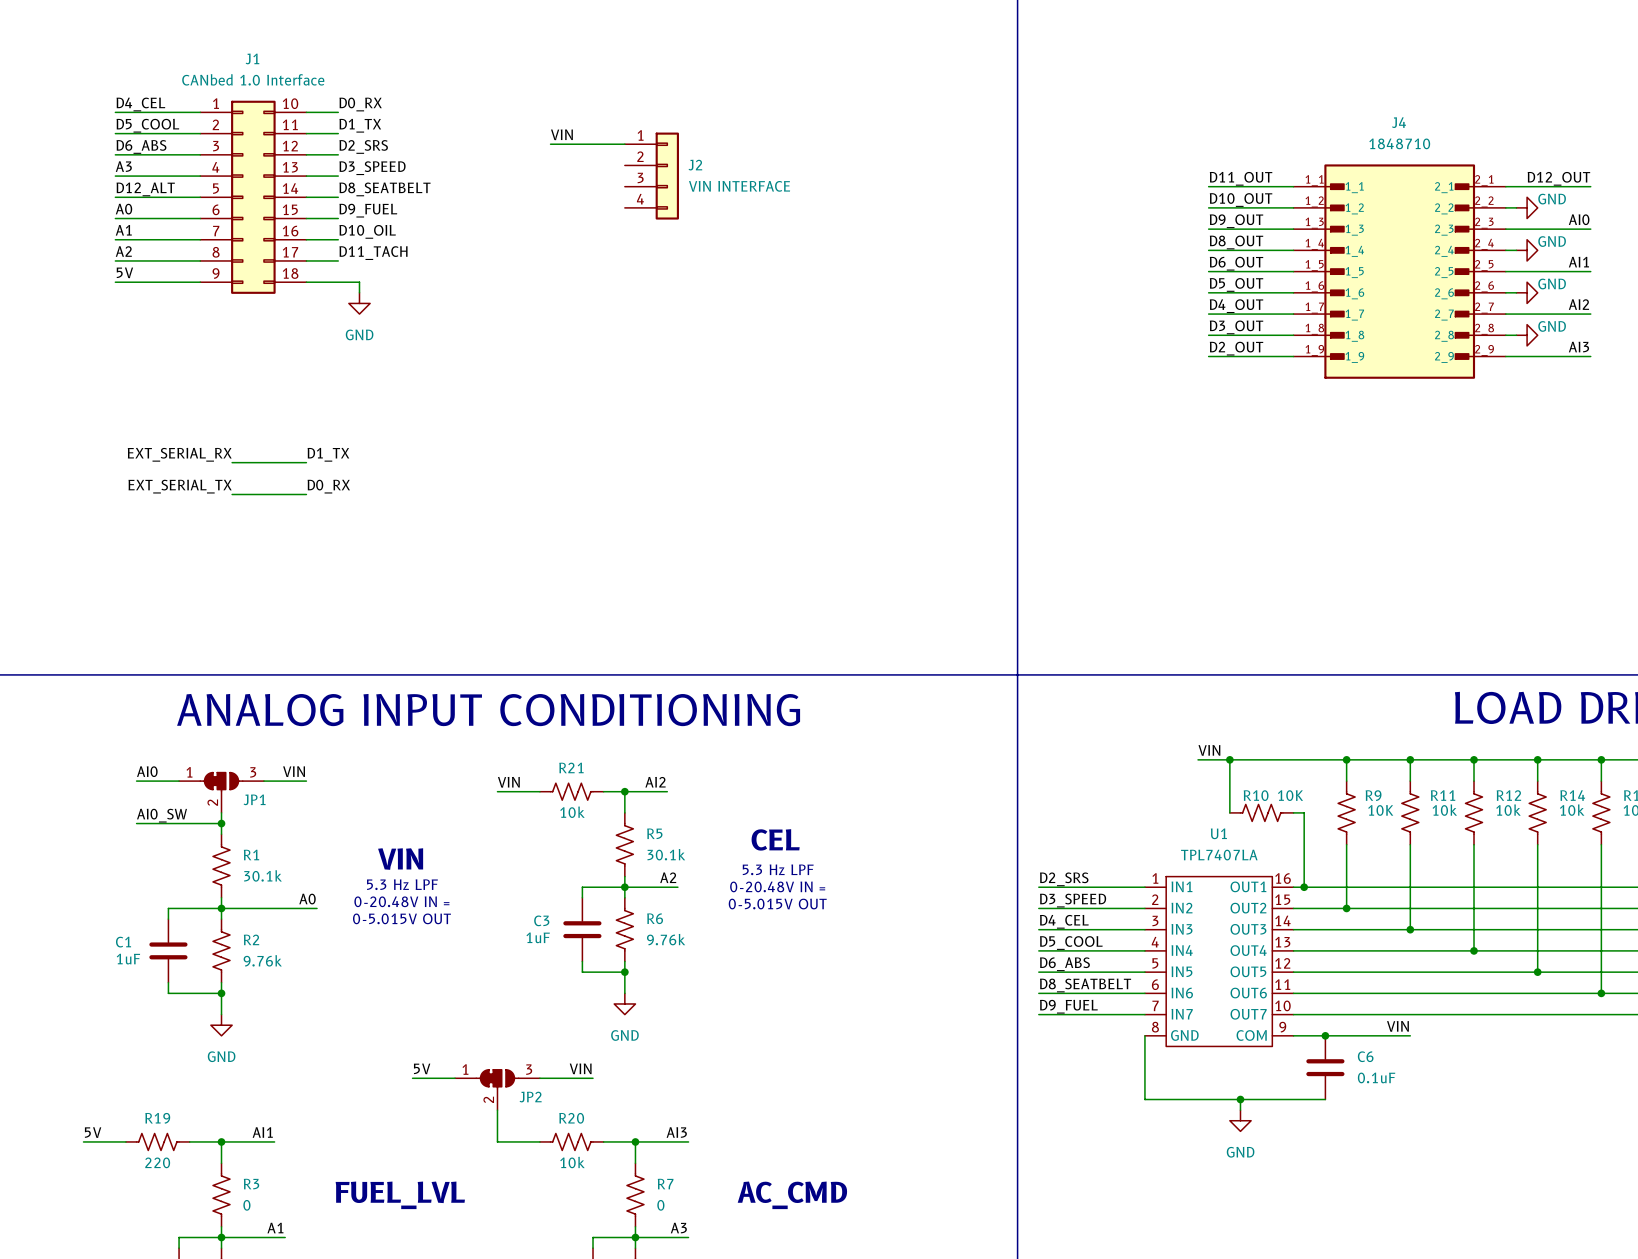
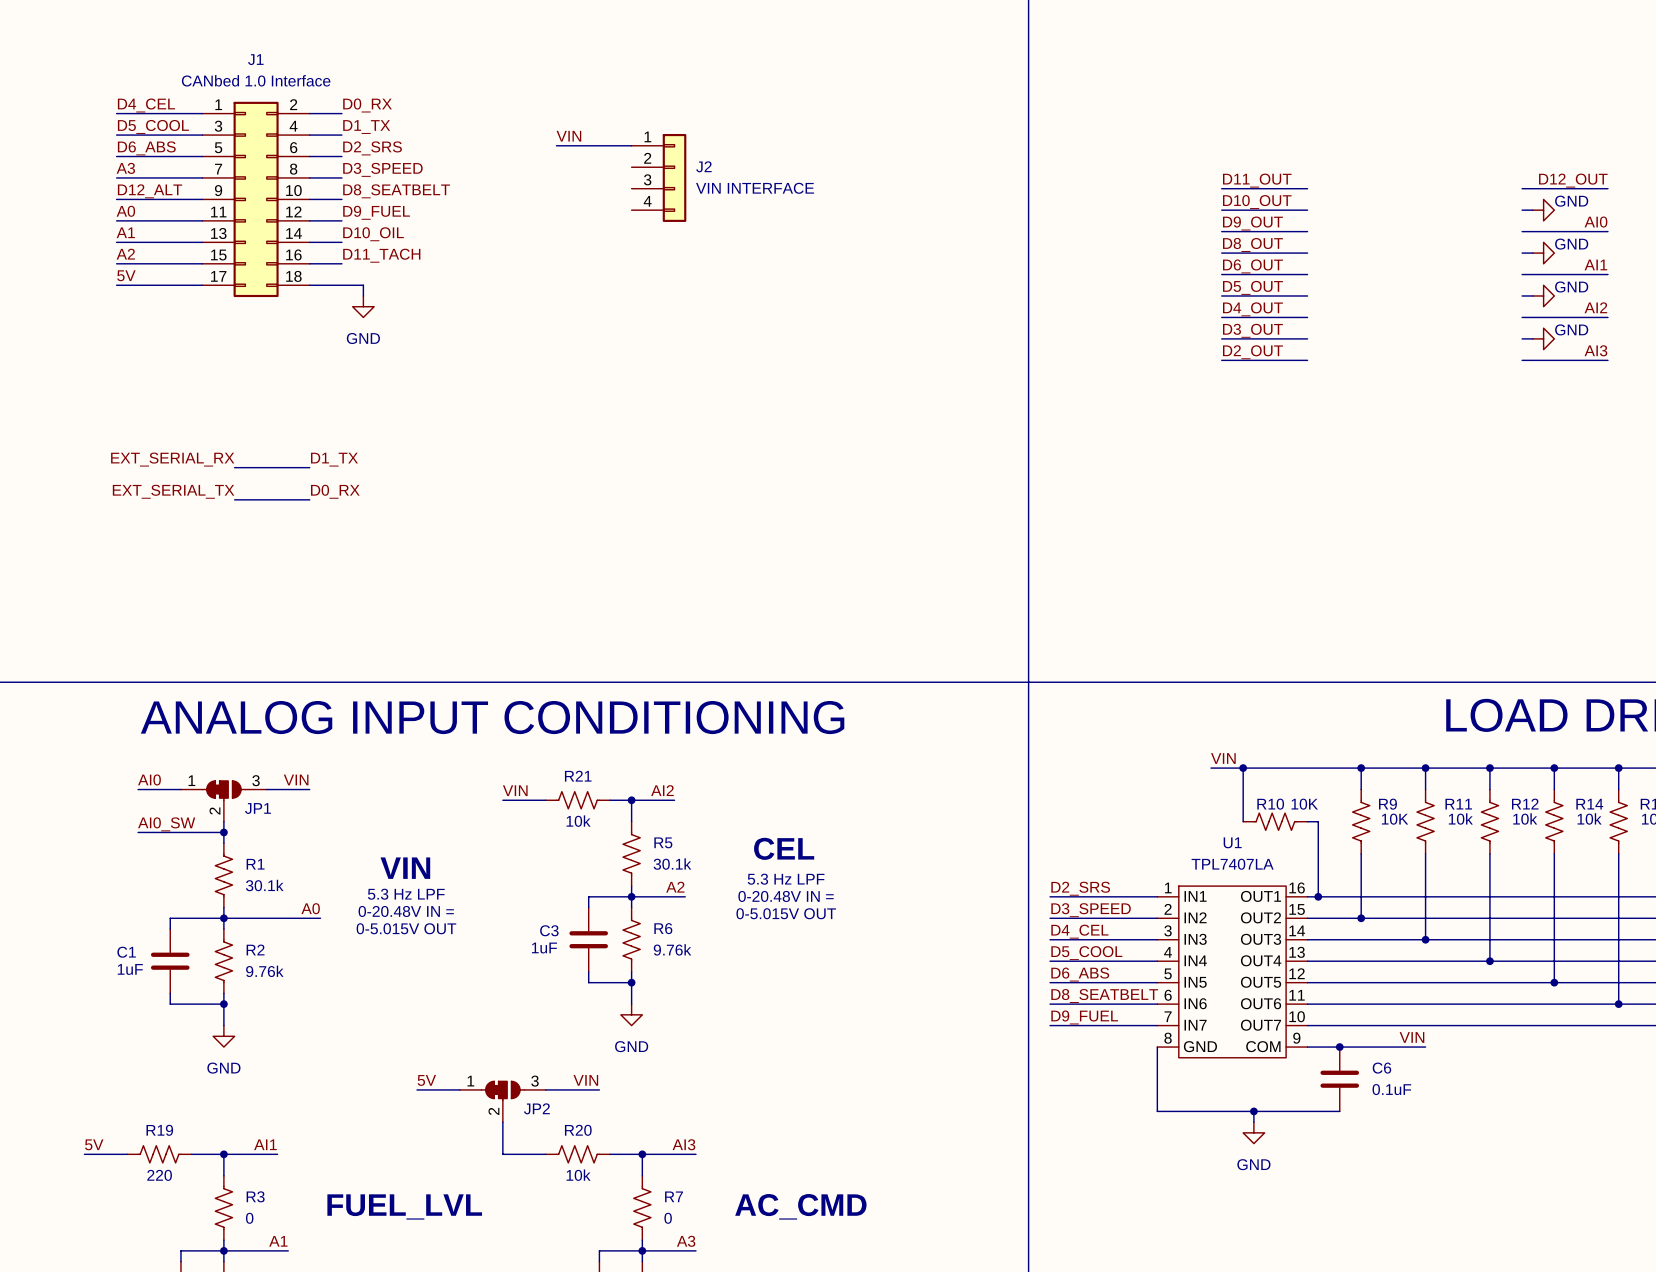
J1 symbol: [200, 100, 307, 294] -> [202, 101, 310, 298]
J4: 1848710 (1399, 271) -> none

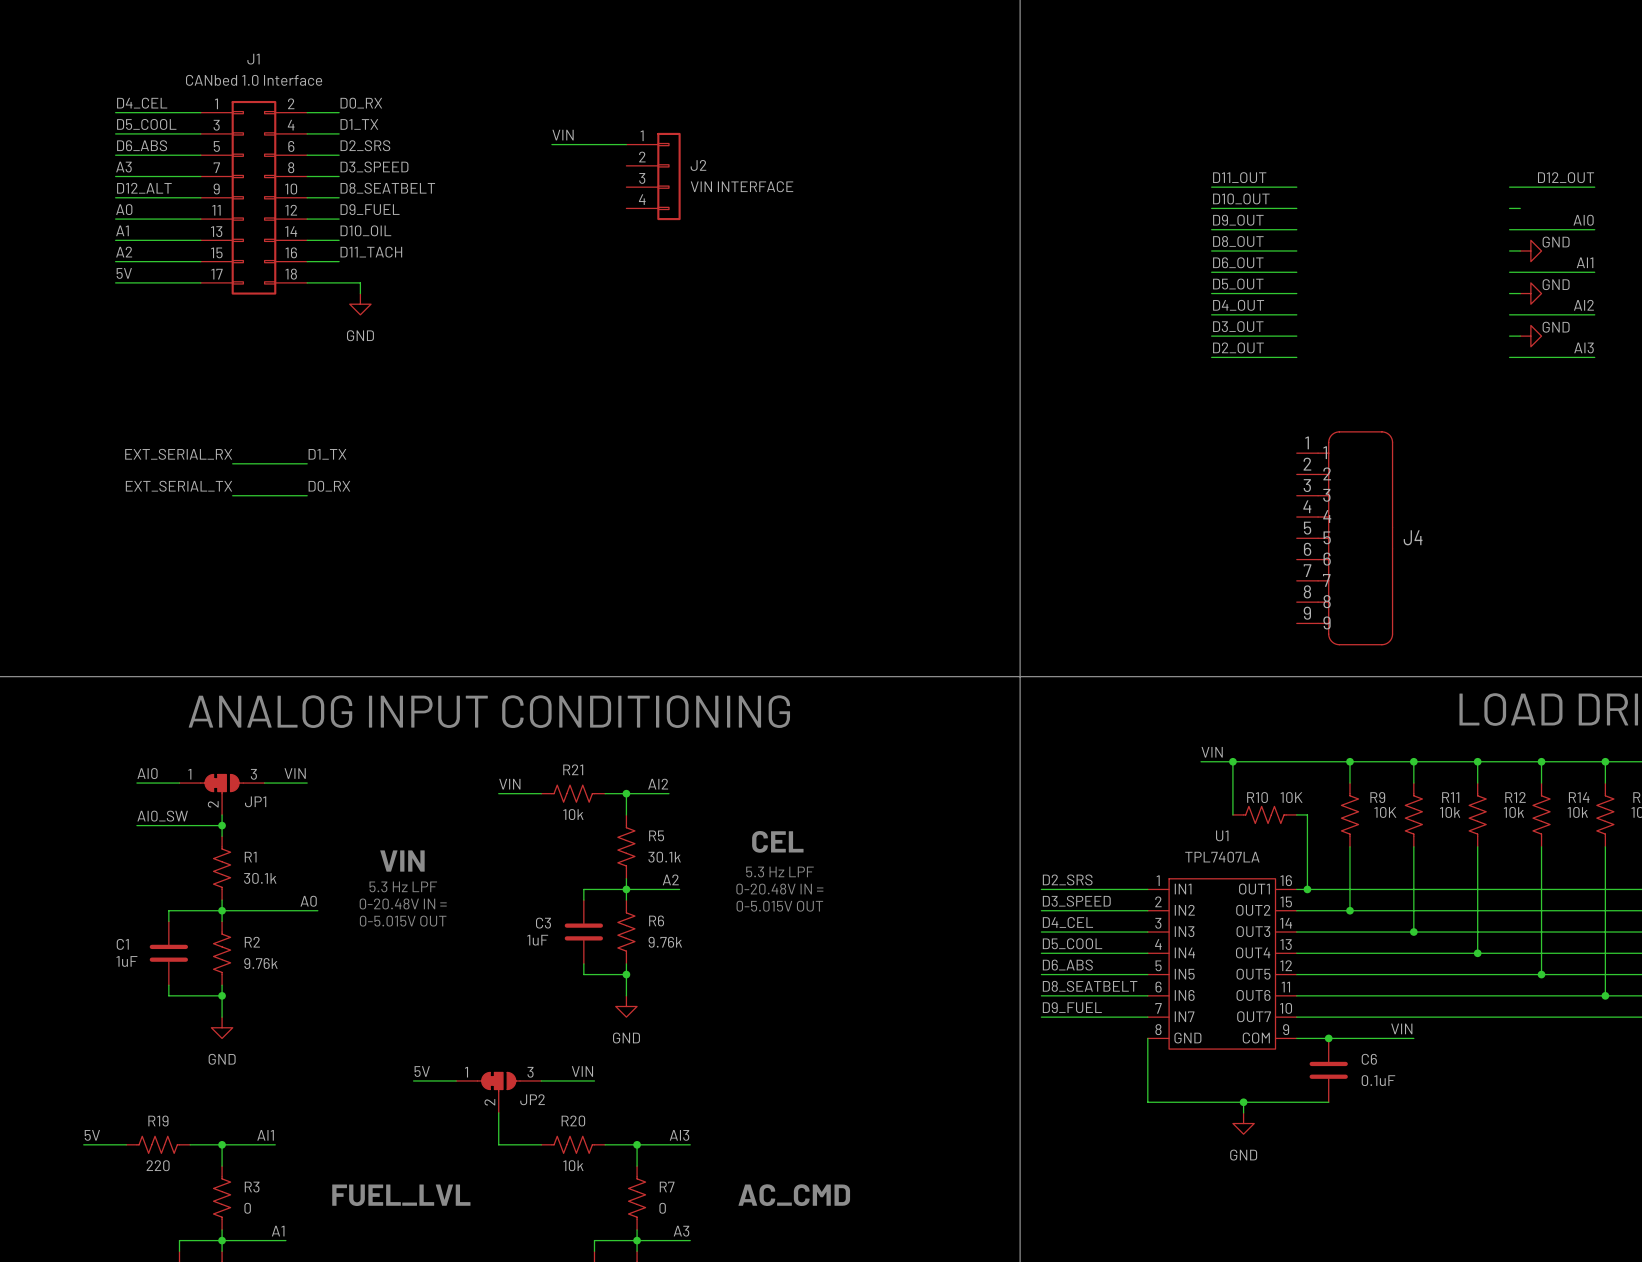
power symbol: GND (1543, 210) -> none
J4: none -> (1344, 538)

